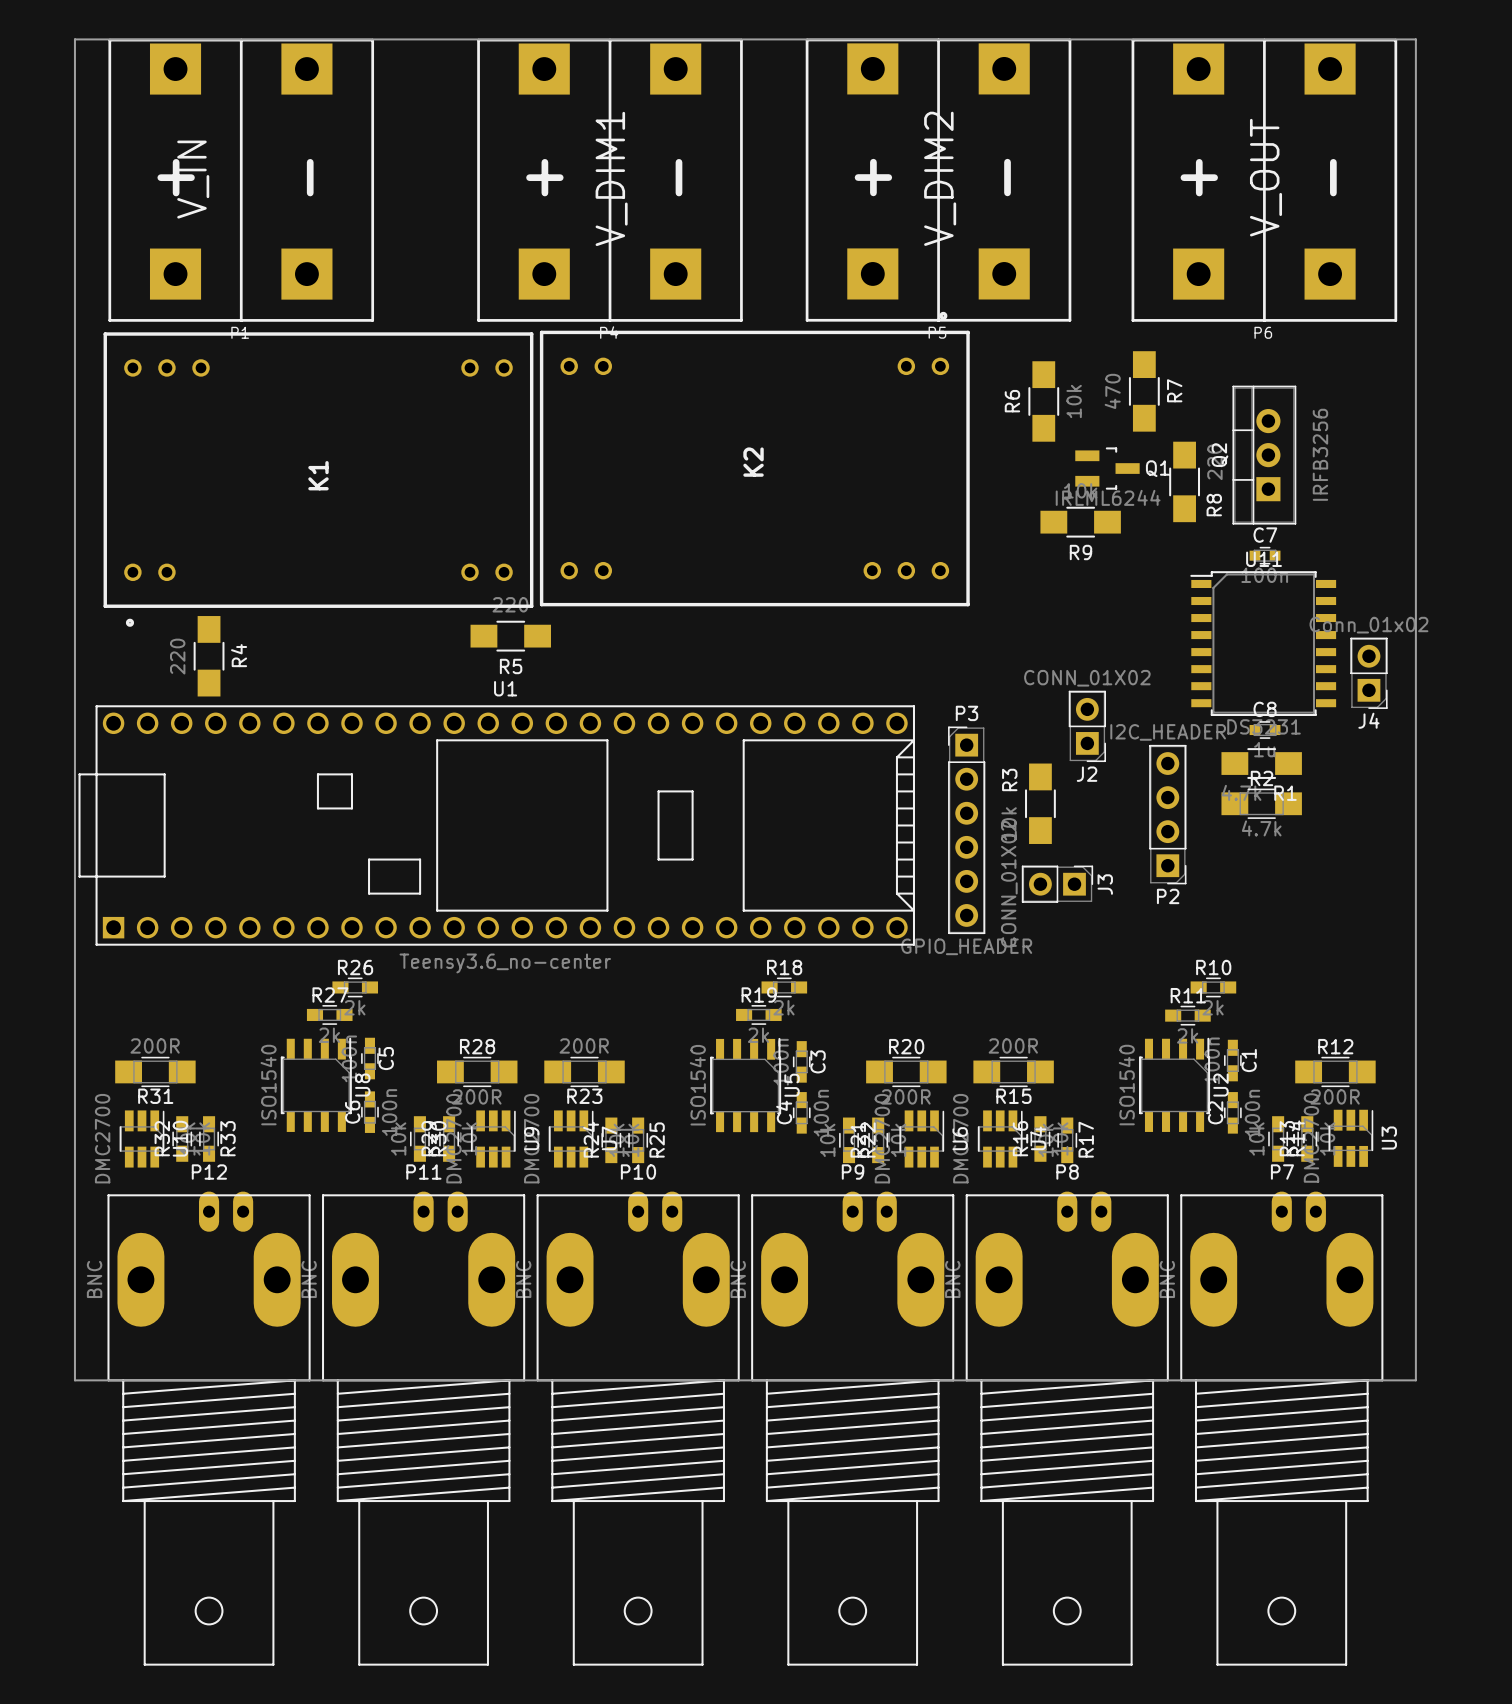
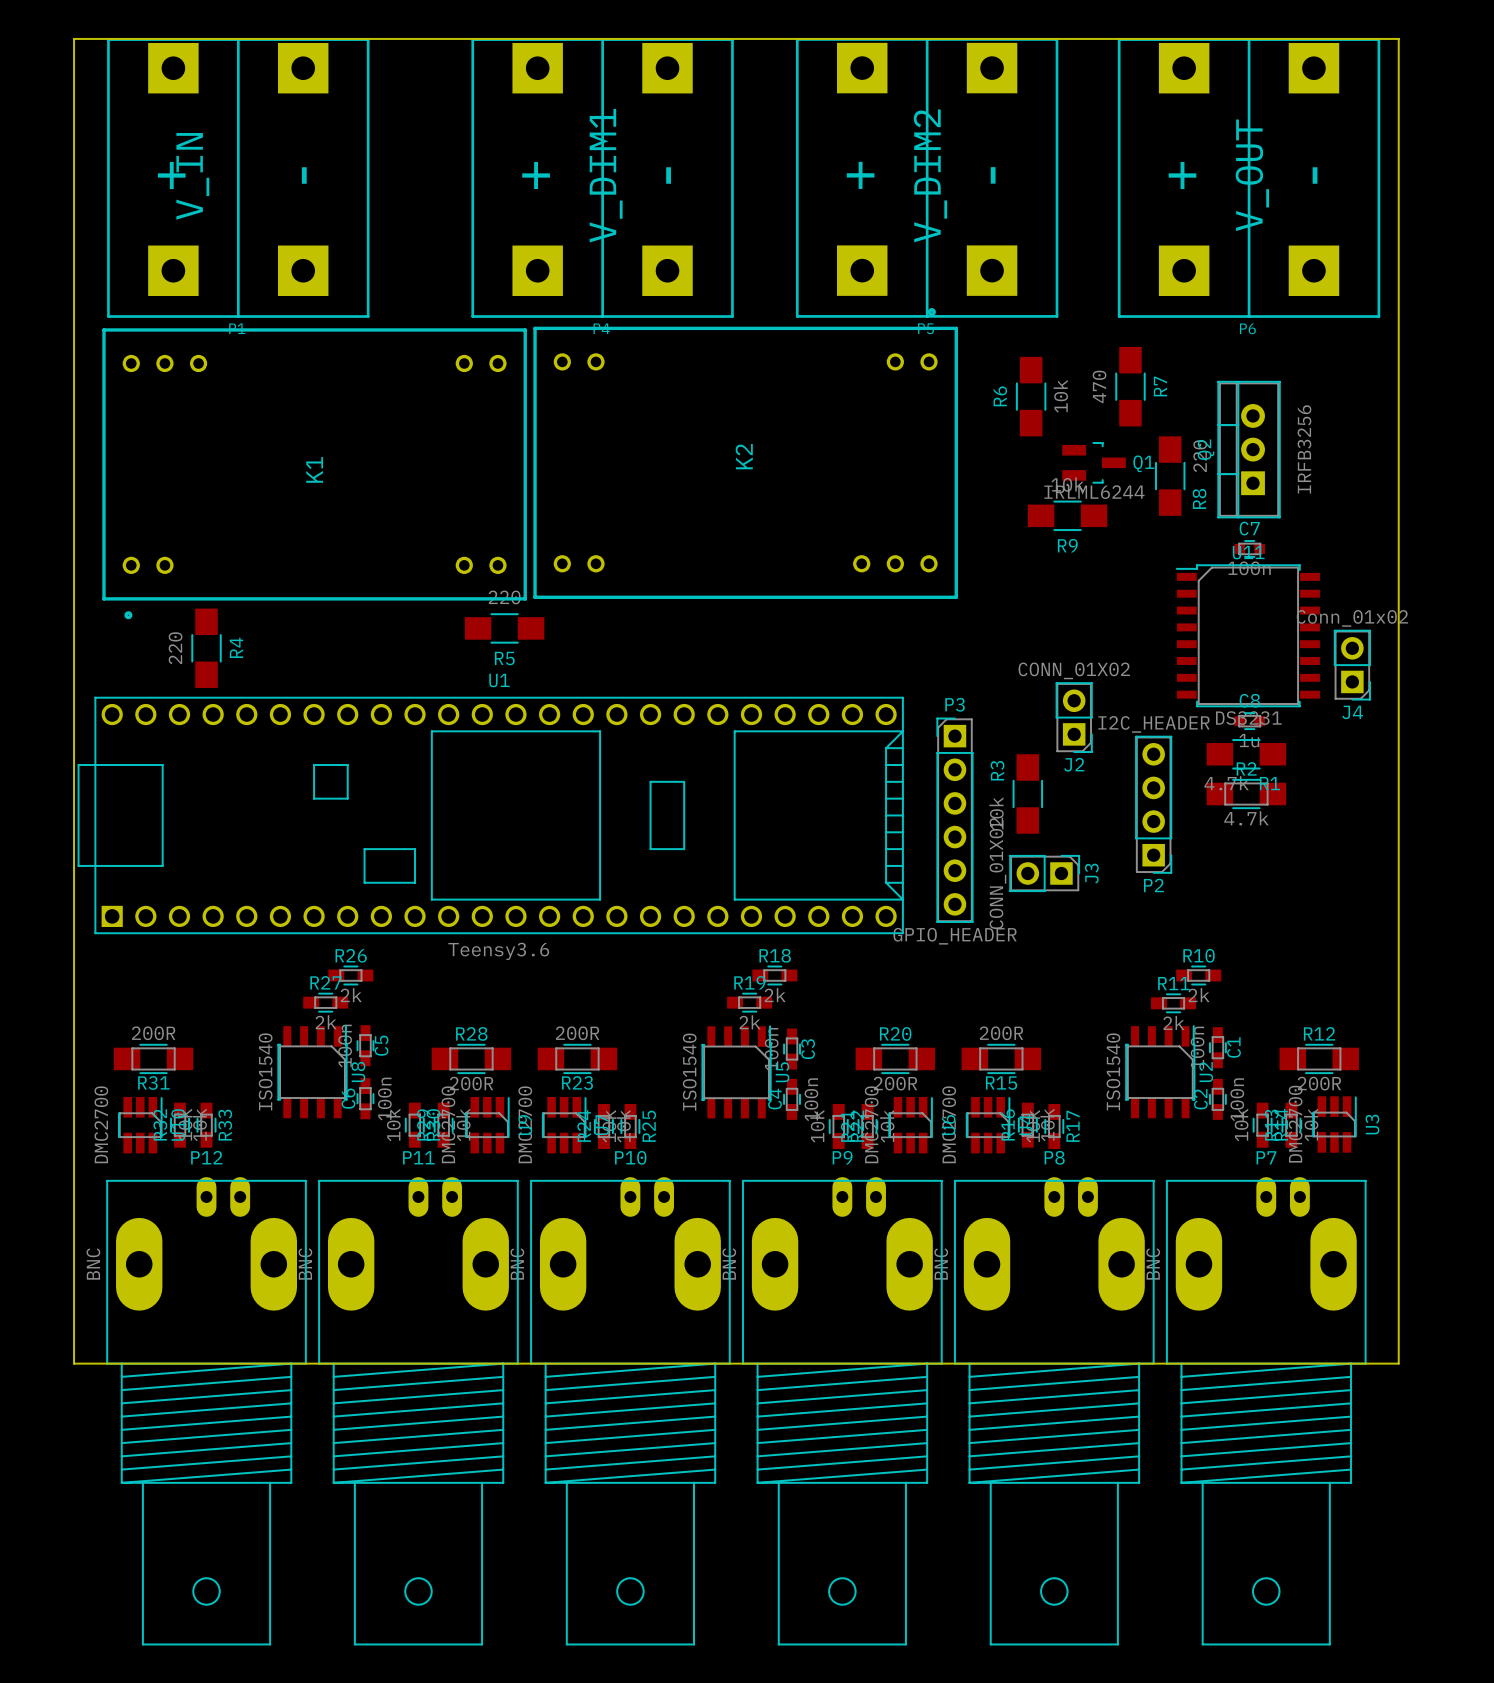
U1 value: Teensy3.6_no-center (505, 963) -> Teensy3.6 (498, 951)

